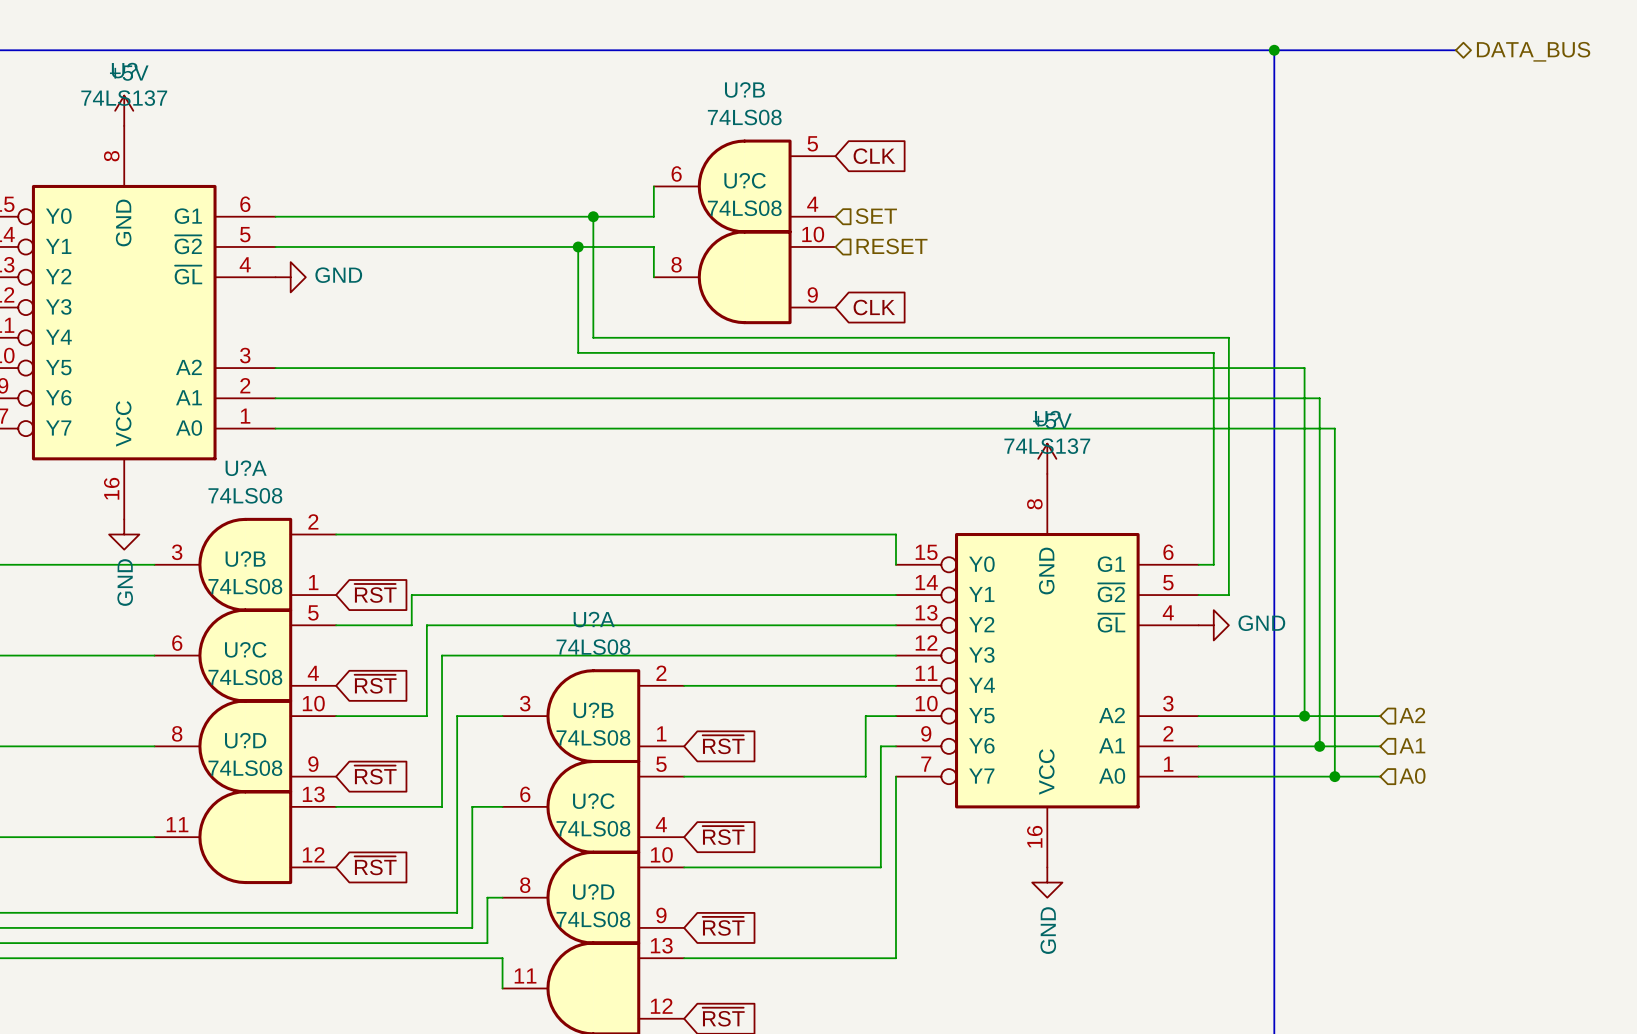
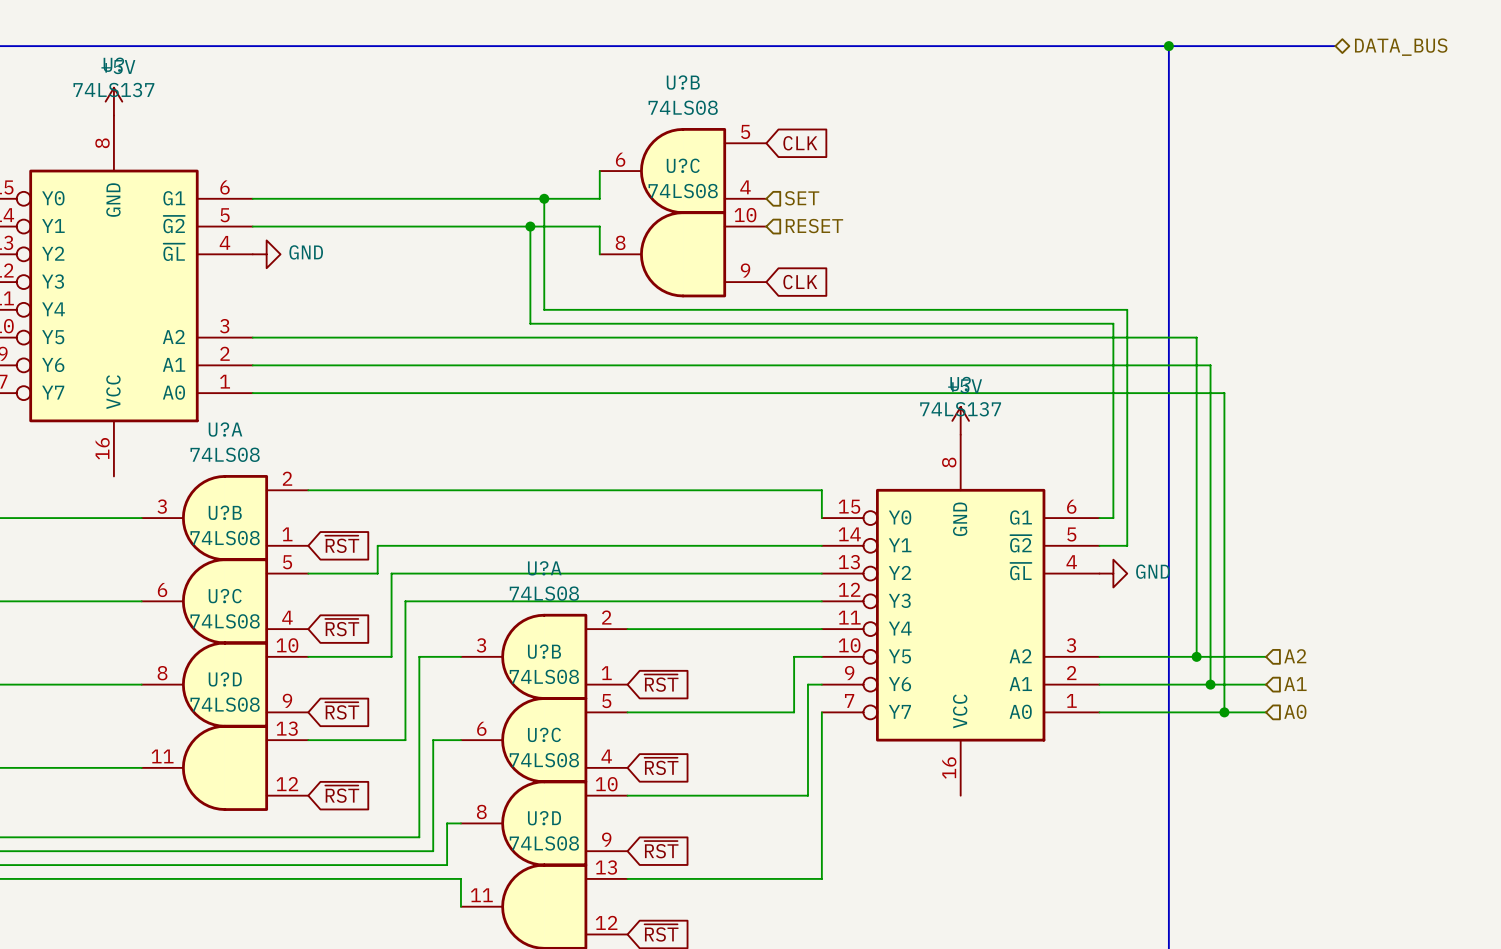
power symbol: GND (124, 534) -> none
power symbol: GND (1047, 882) -> none

